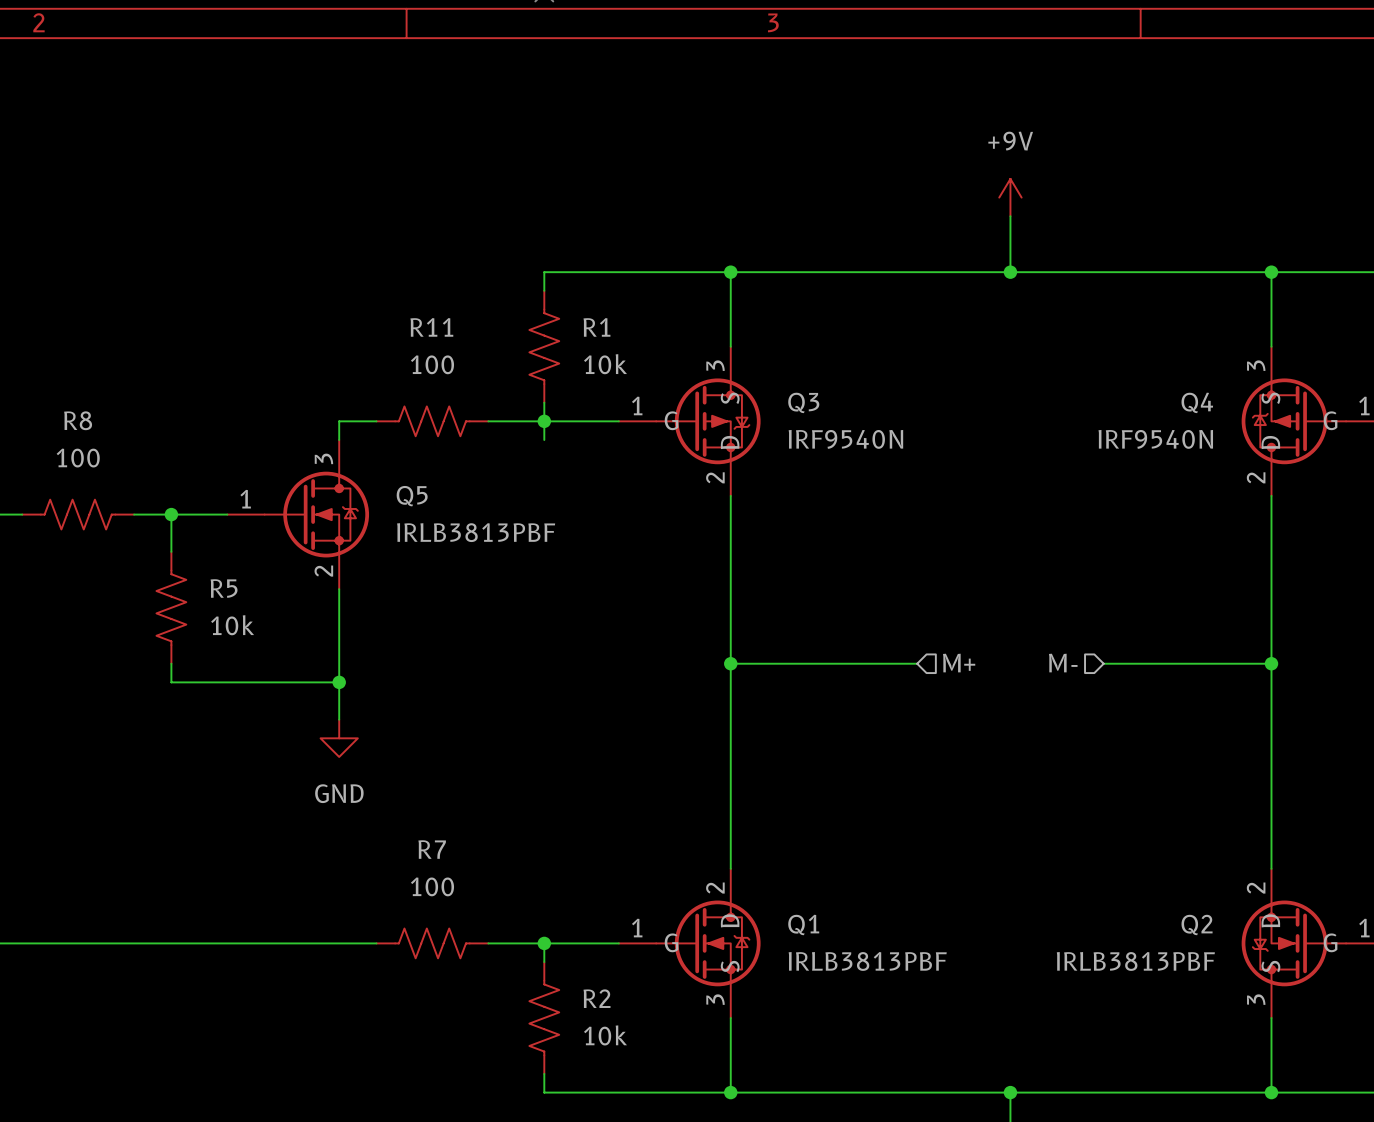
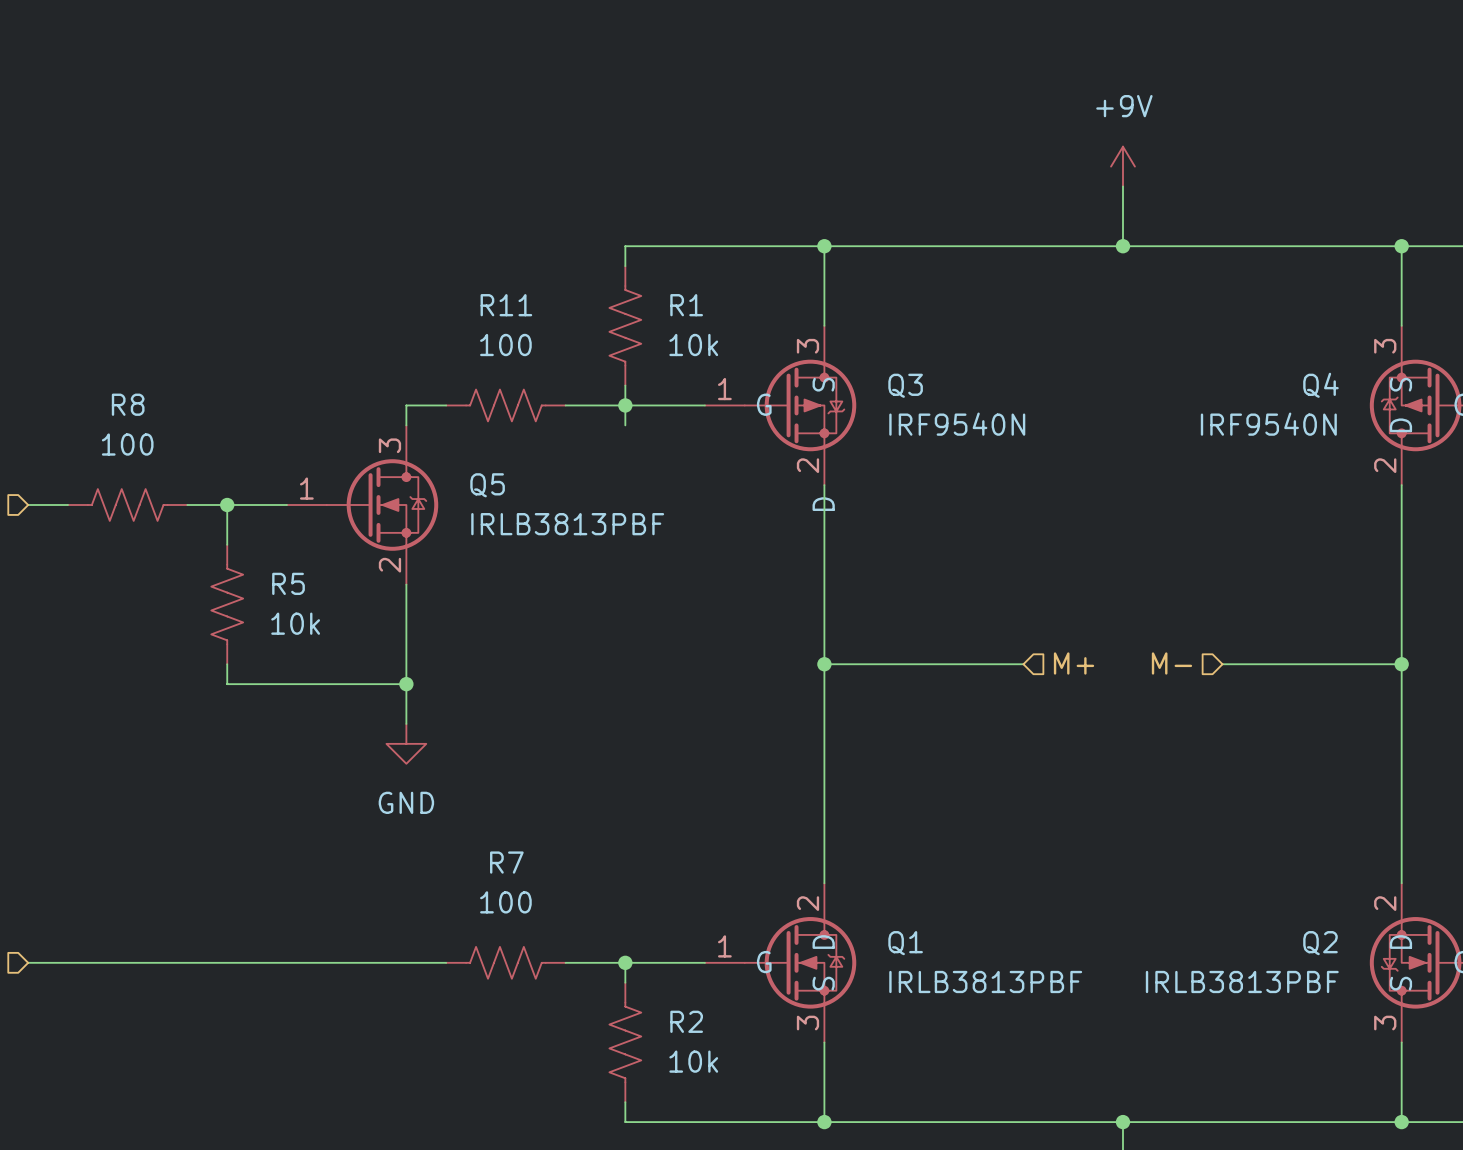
Q3 pin name: D (730, 442) -> none
Q3 pin name: none -> D (823, 504)

